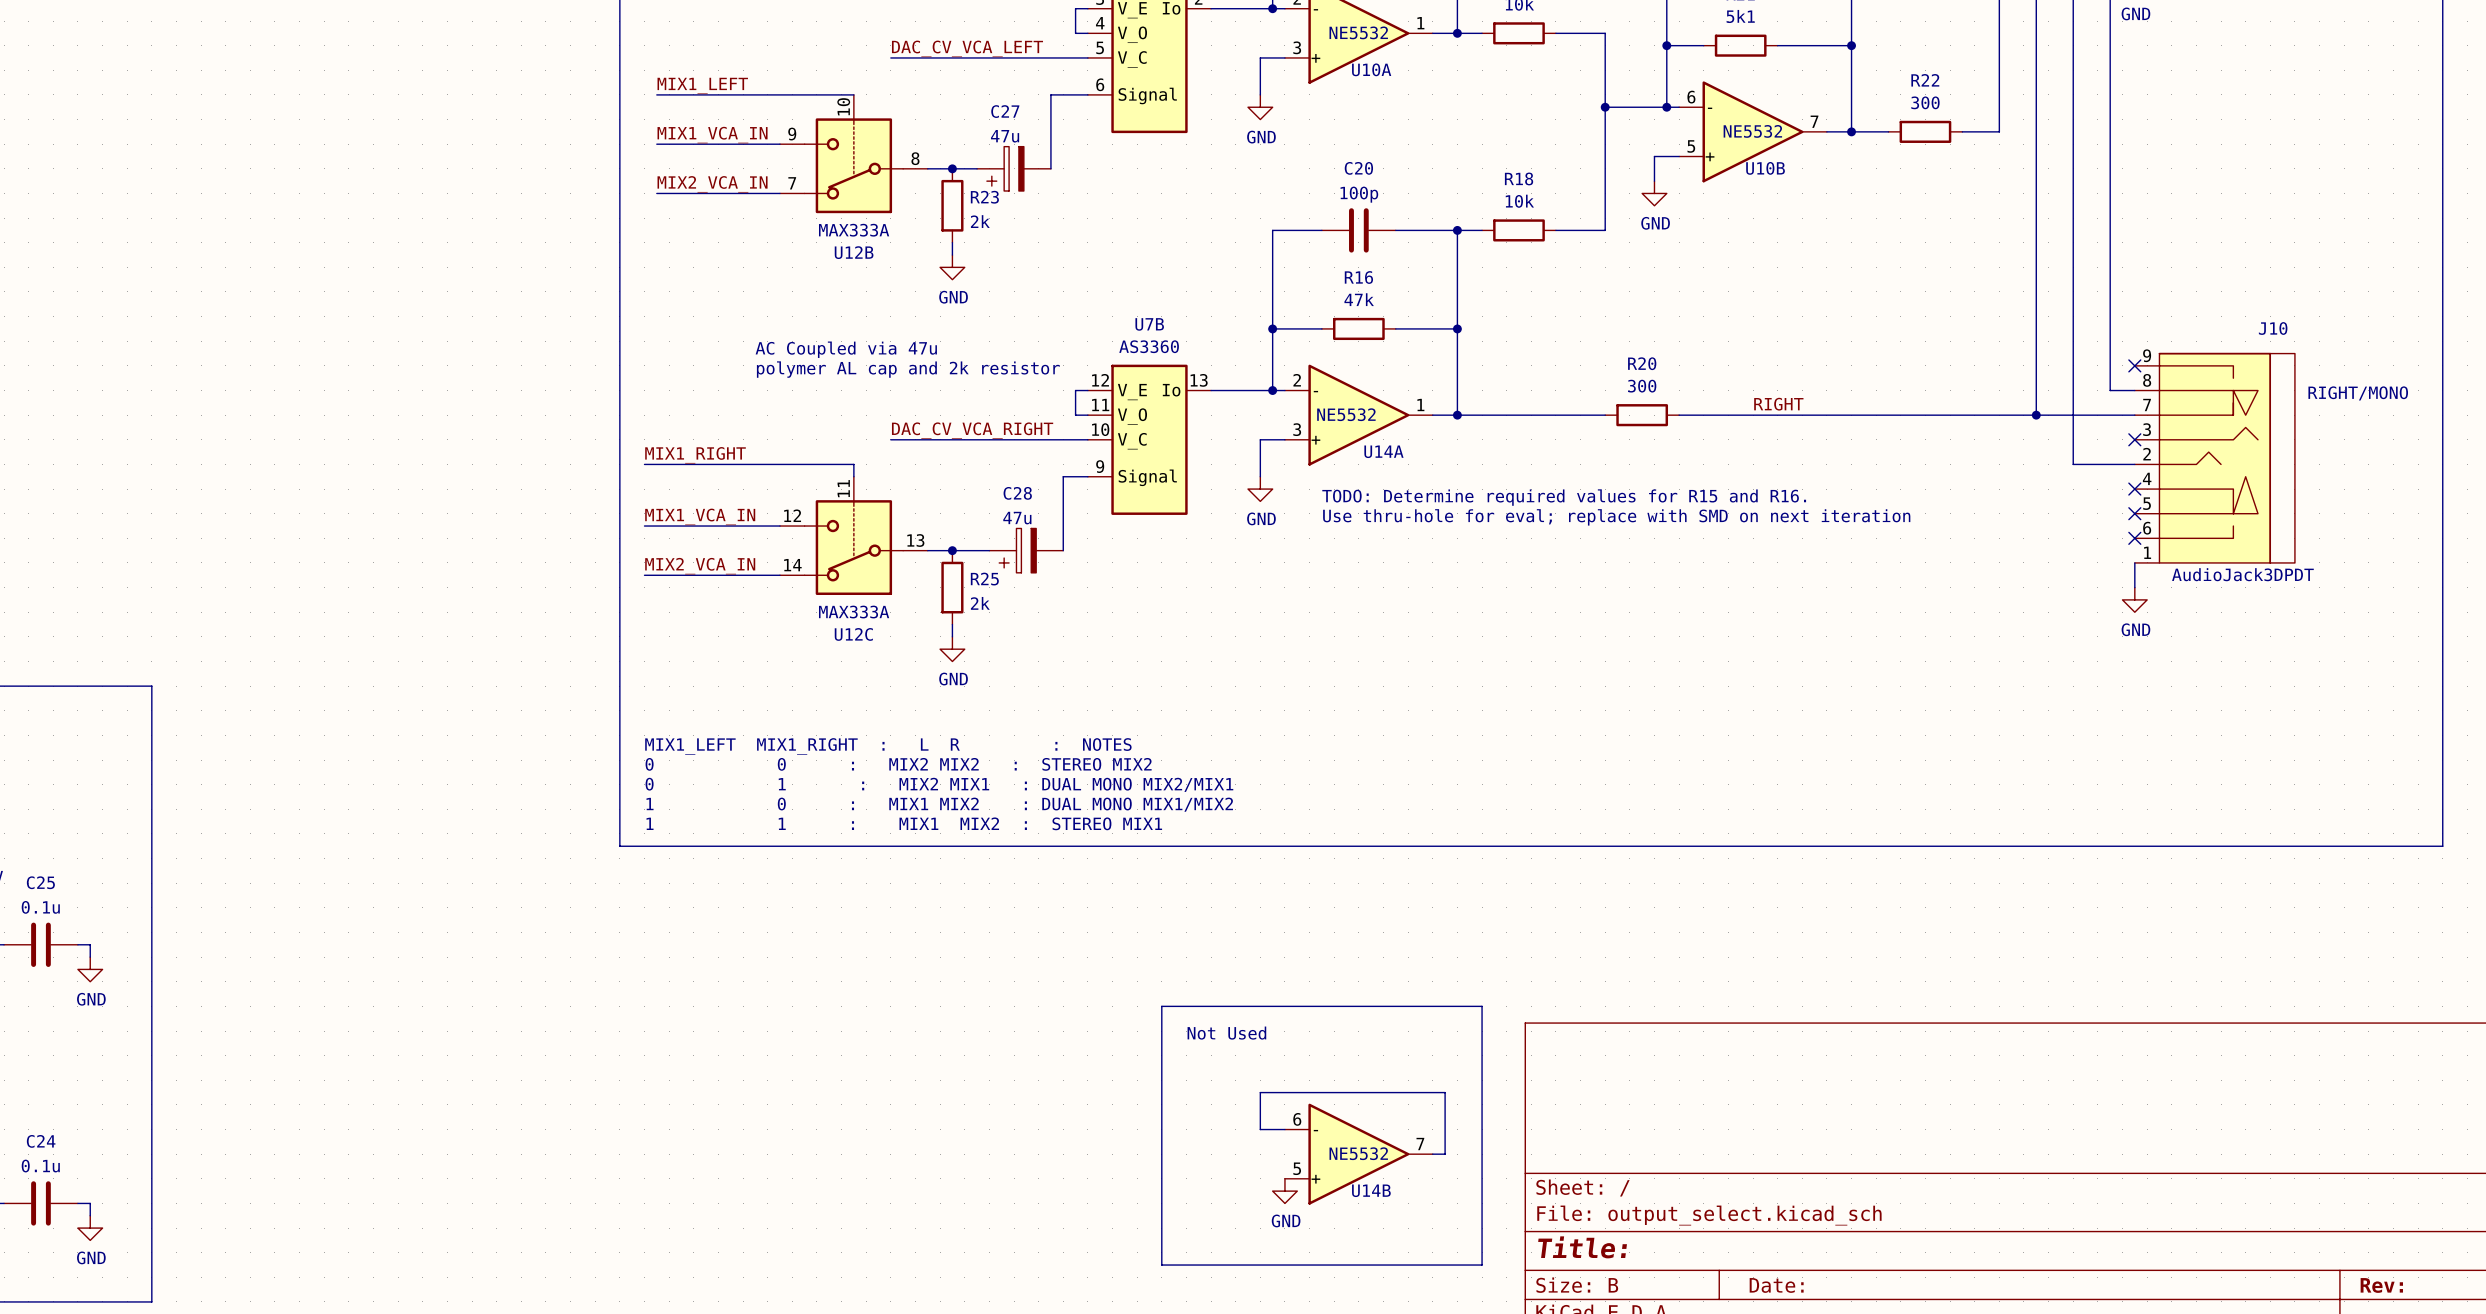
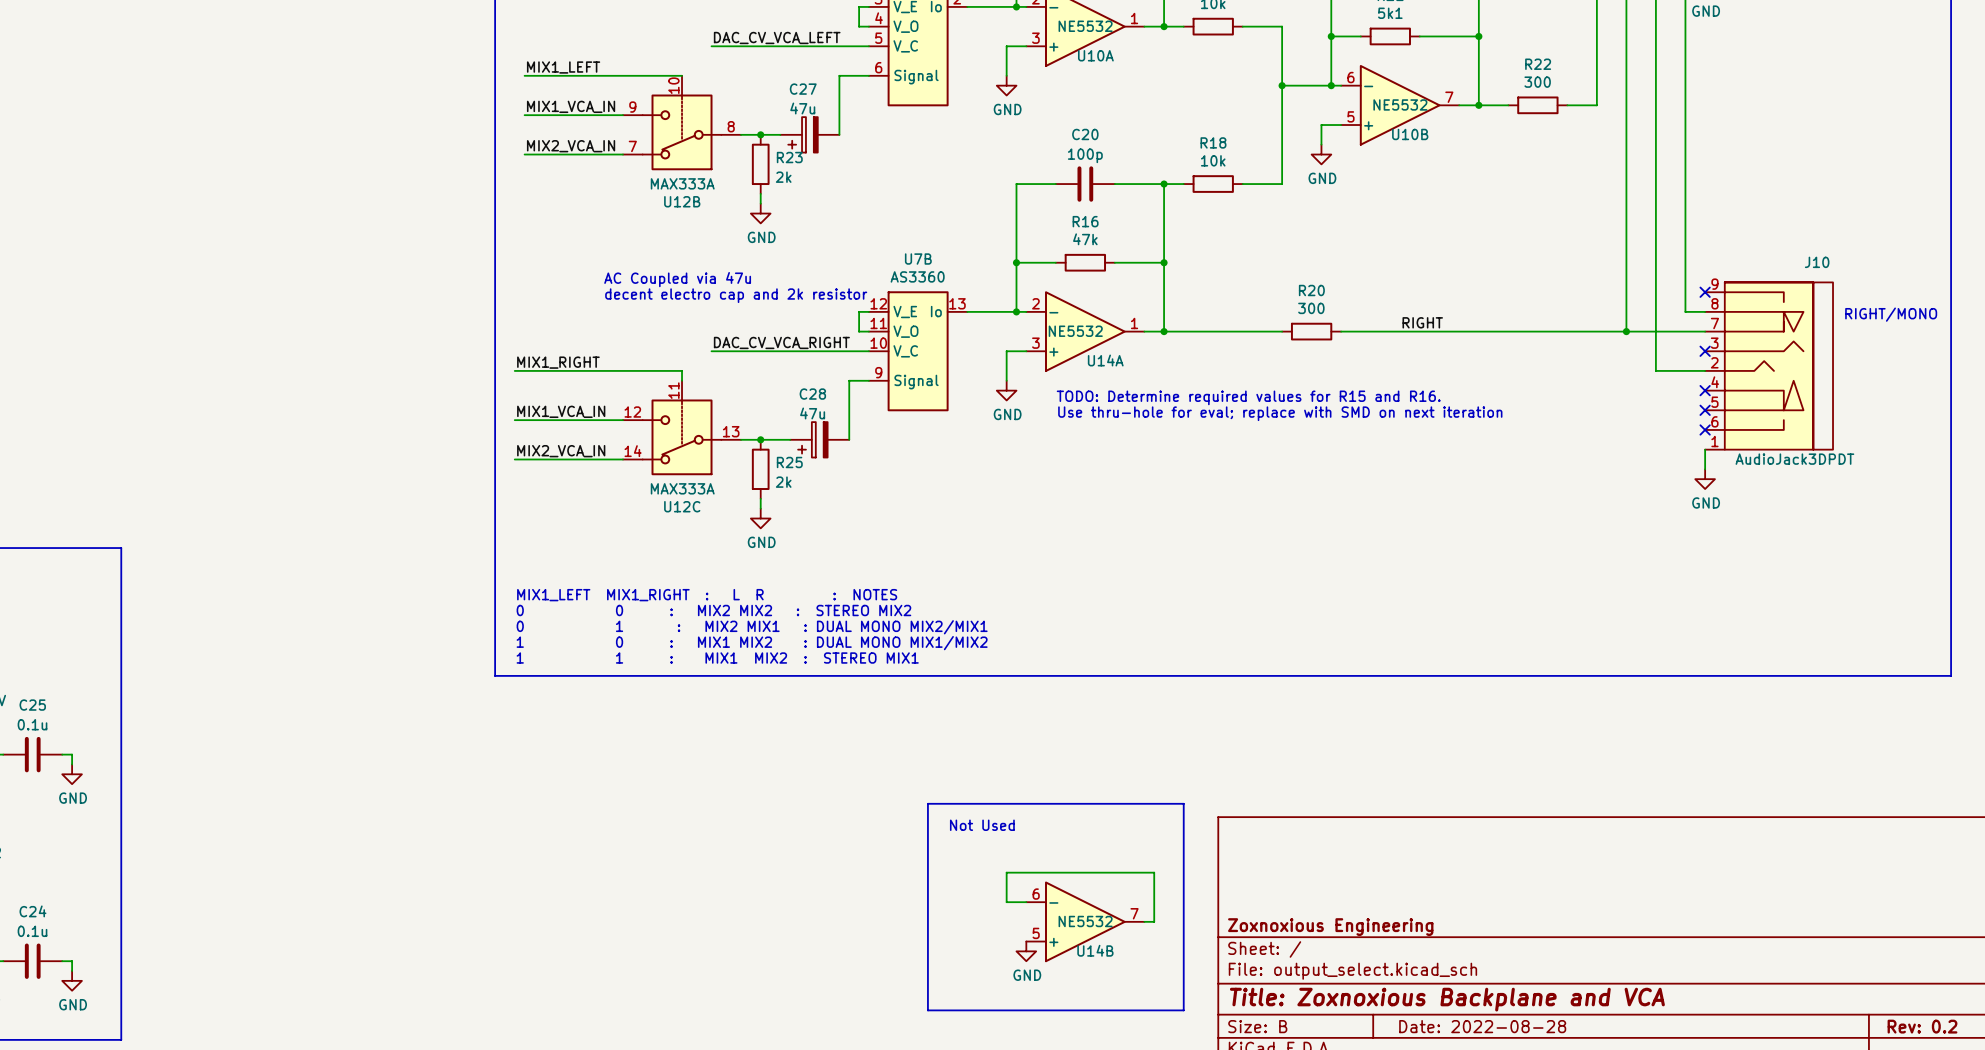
text: polymer AL cap and 2k resistor (908, 369) -> decent electro cap and 2k resistor (736, 295)
title block: none -> Zoxnoxious Engineering (1330, 927)
title block: Title: (1582, 1247) -> Title: Zoxnoxious Backplane and VCA (1447, 999)
title block: Date: (1776, 1285) -> Date: 2022-08-28 (1482, 1026)
title block: Rev: (2381, 1285) -> Rev: 0.2 (1922, 1026)

